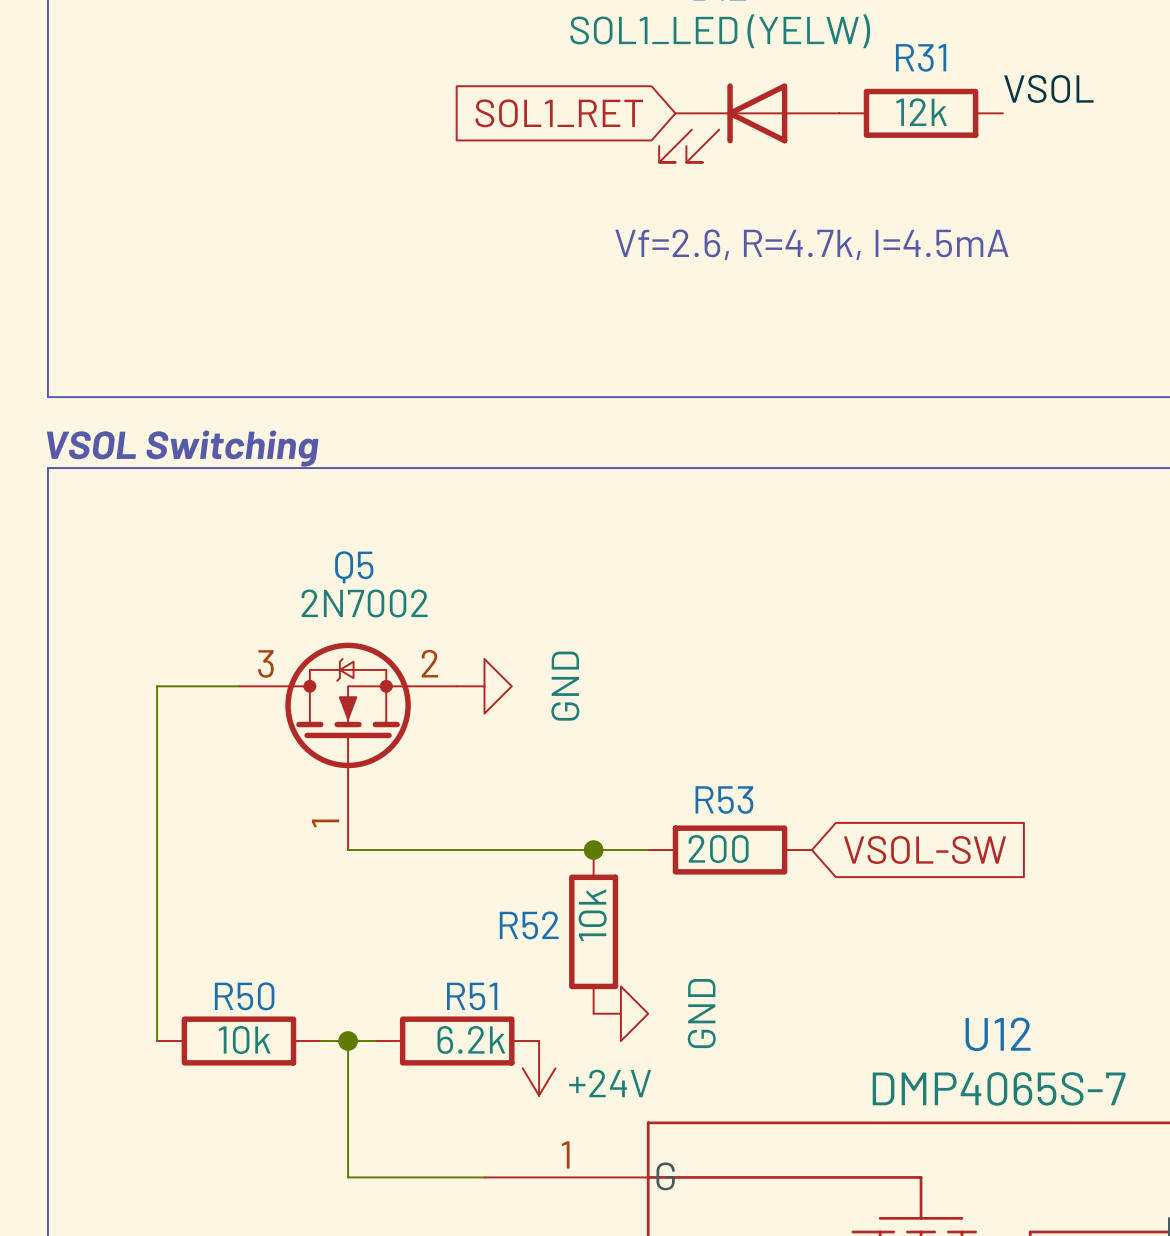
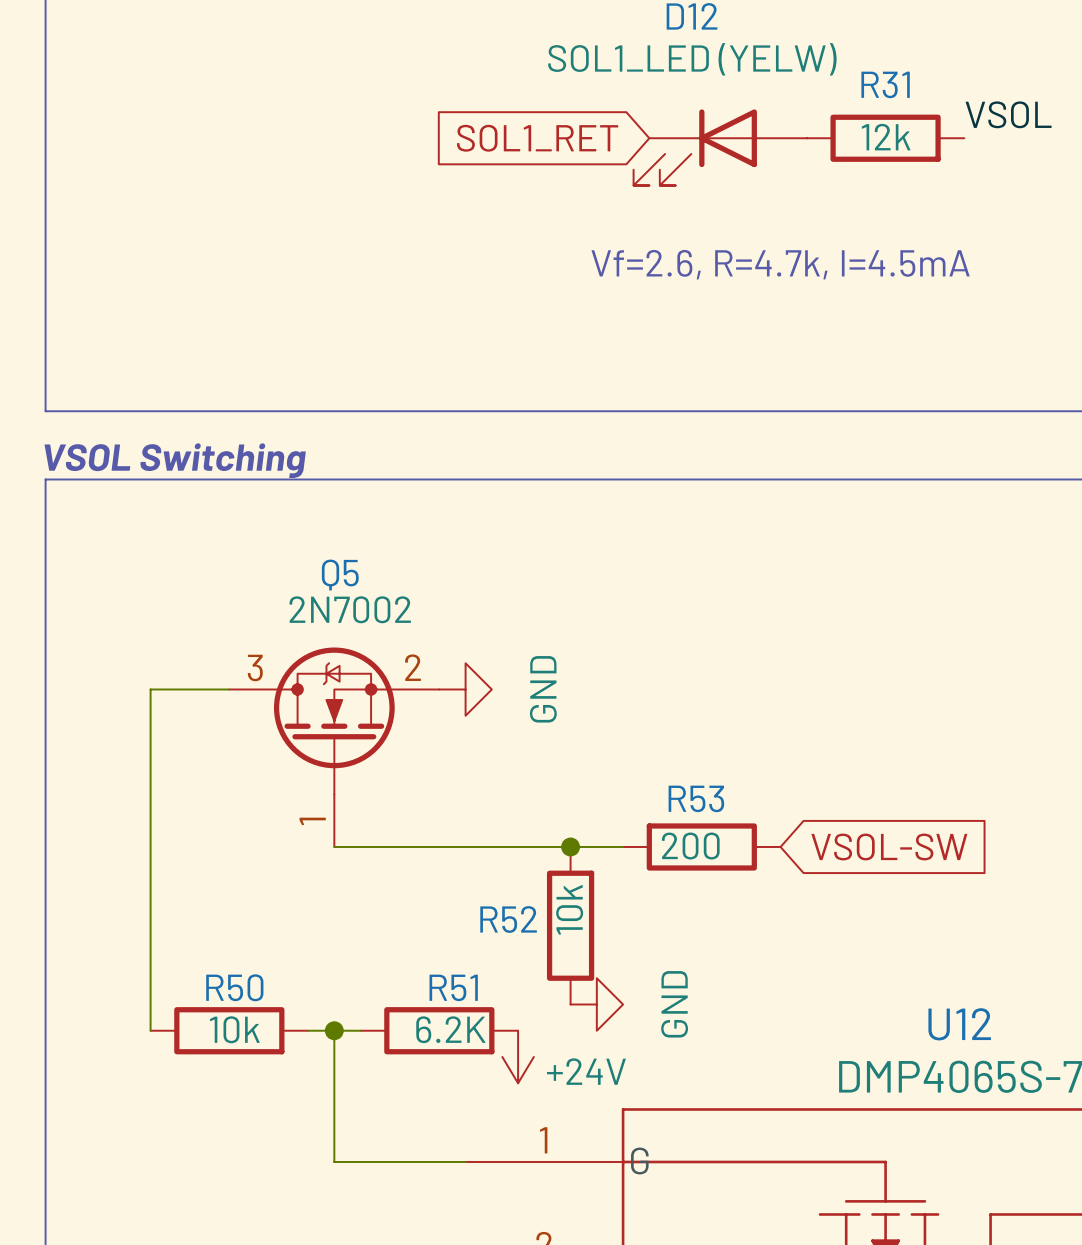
R51 value: 6.2k (471, 1039) -> 6.2K (450, 1029)

